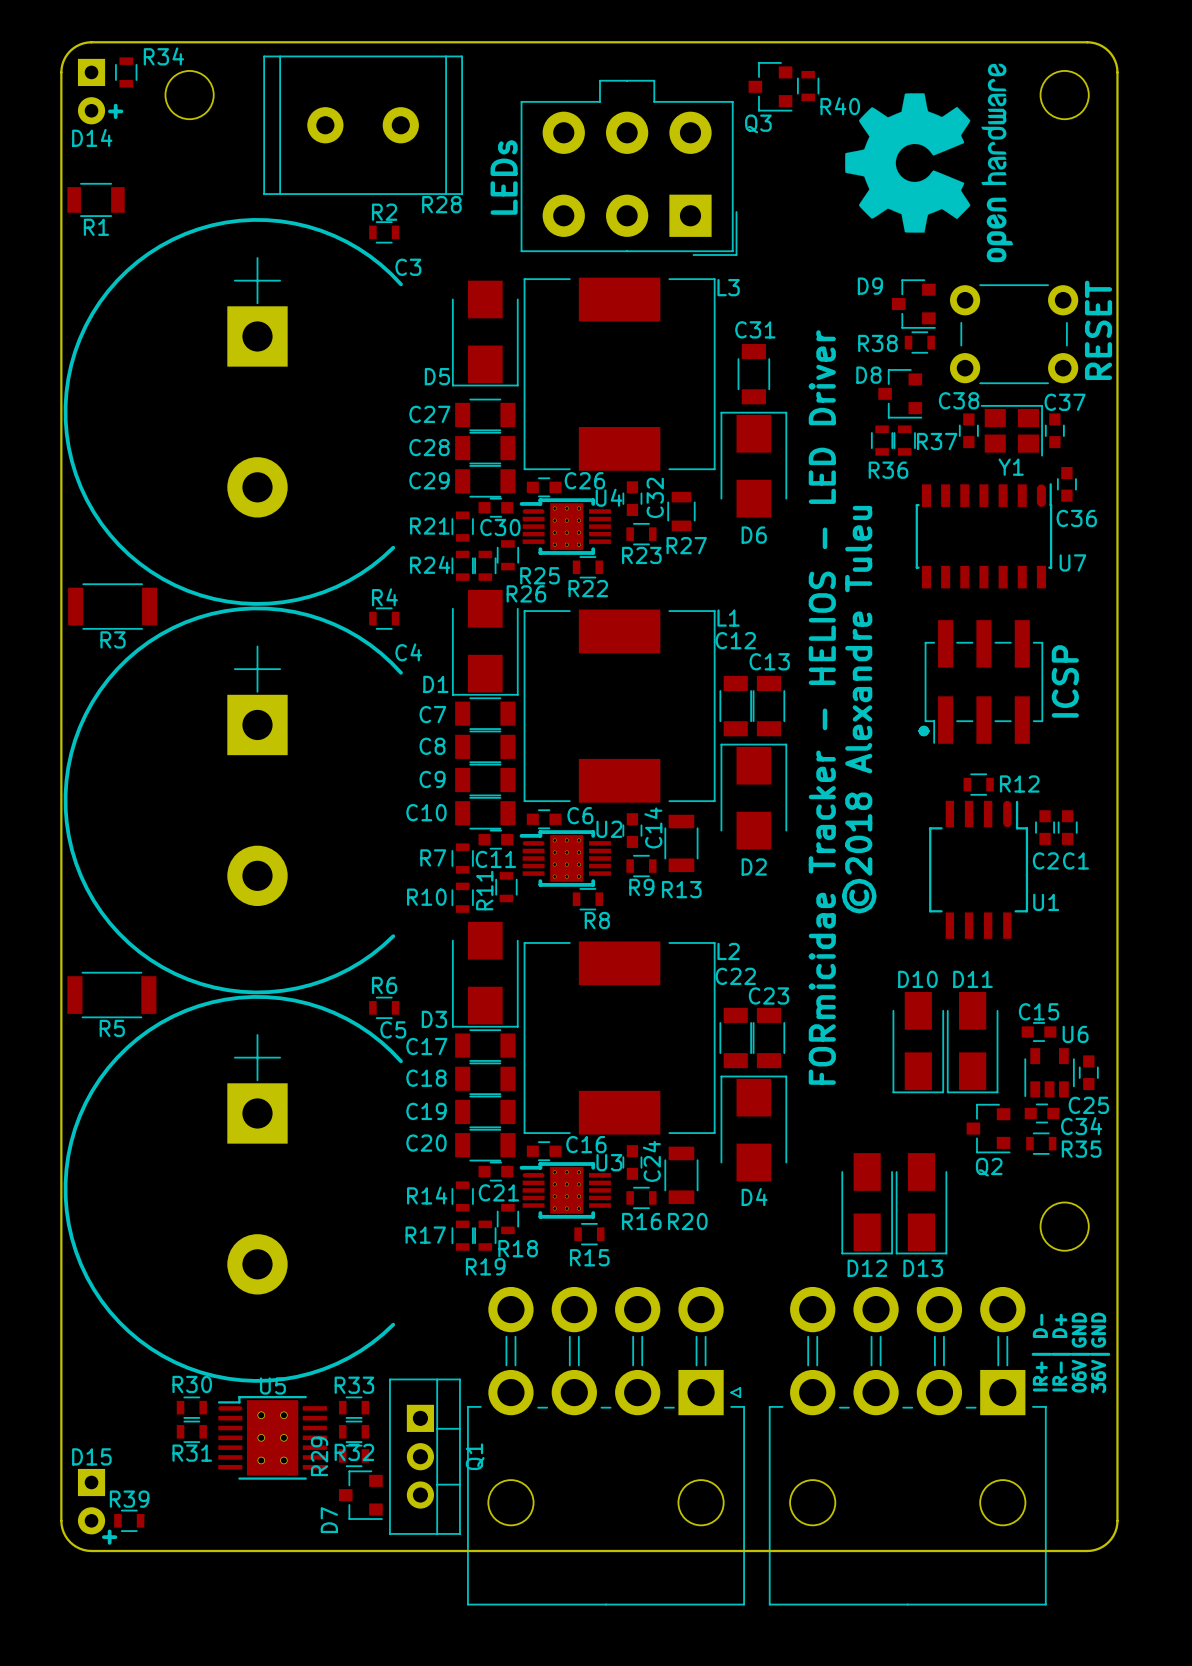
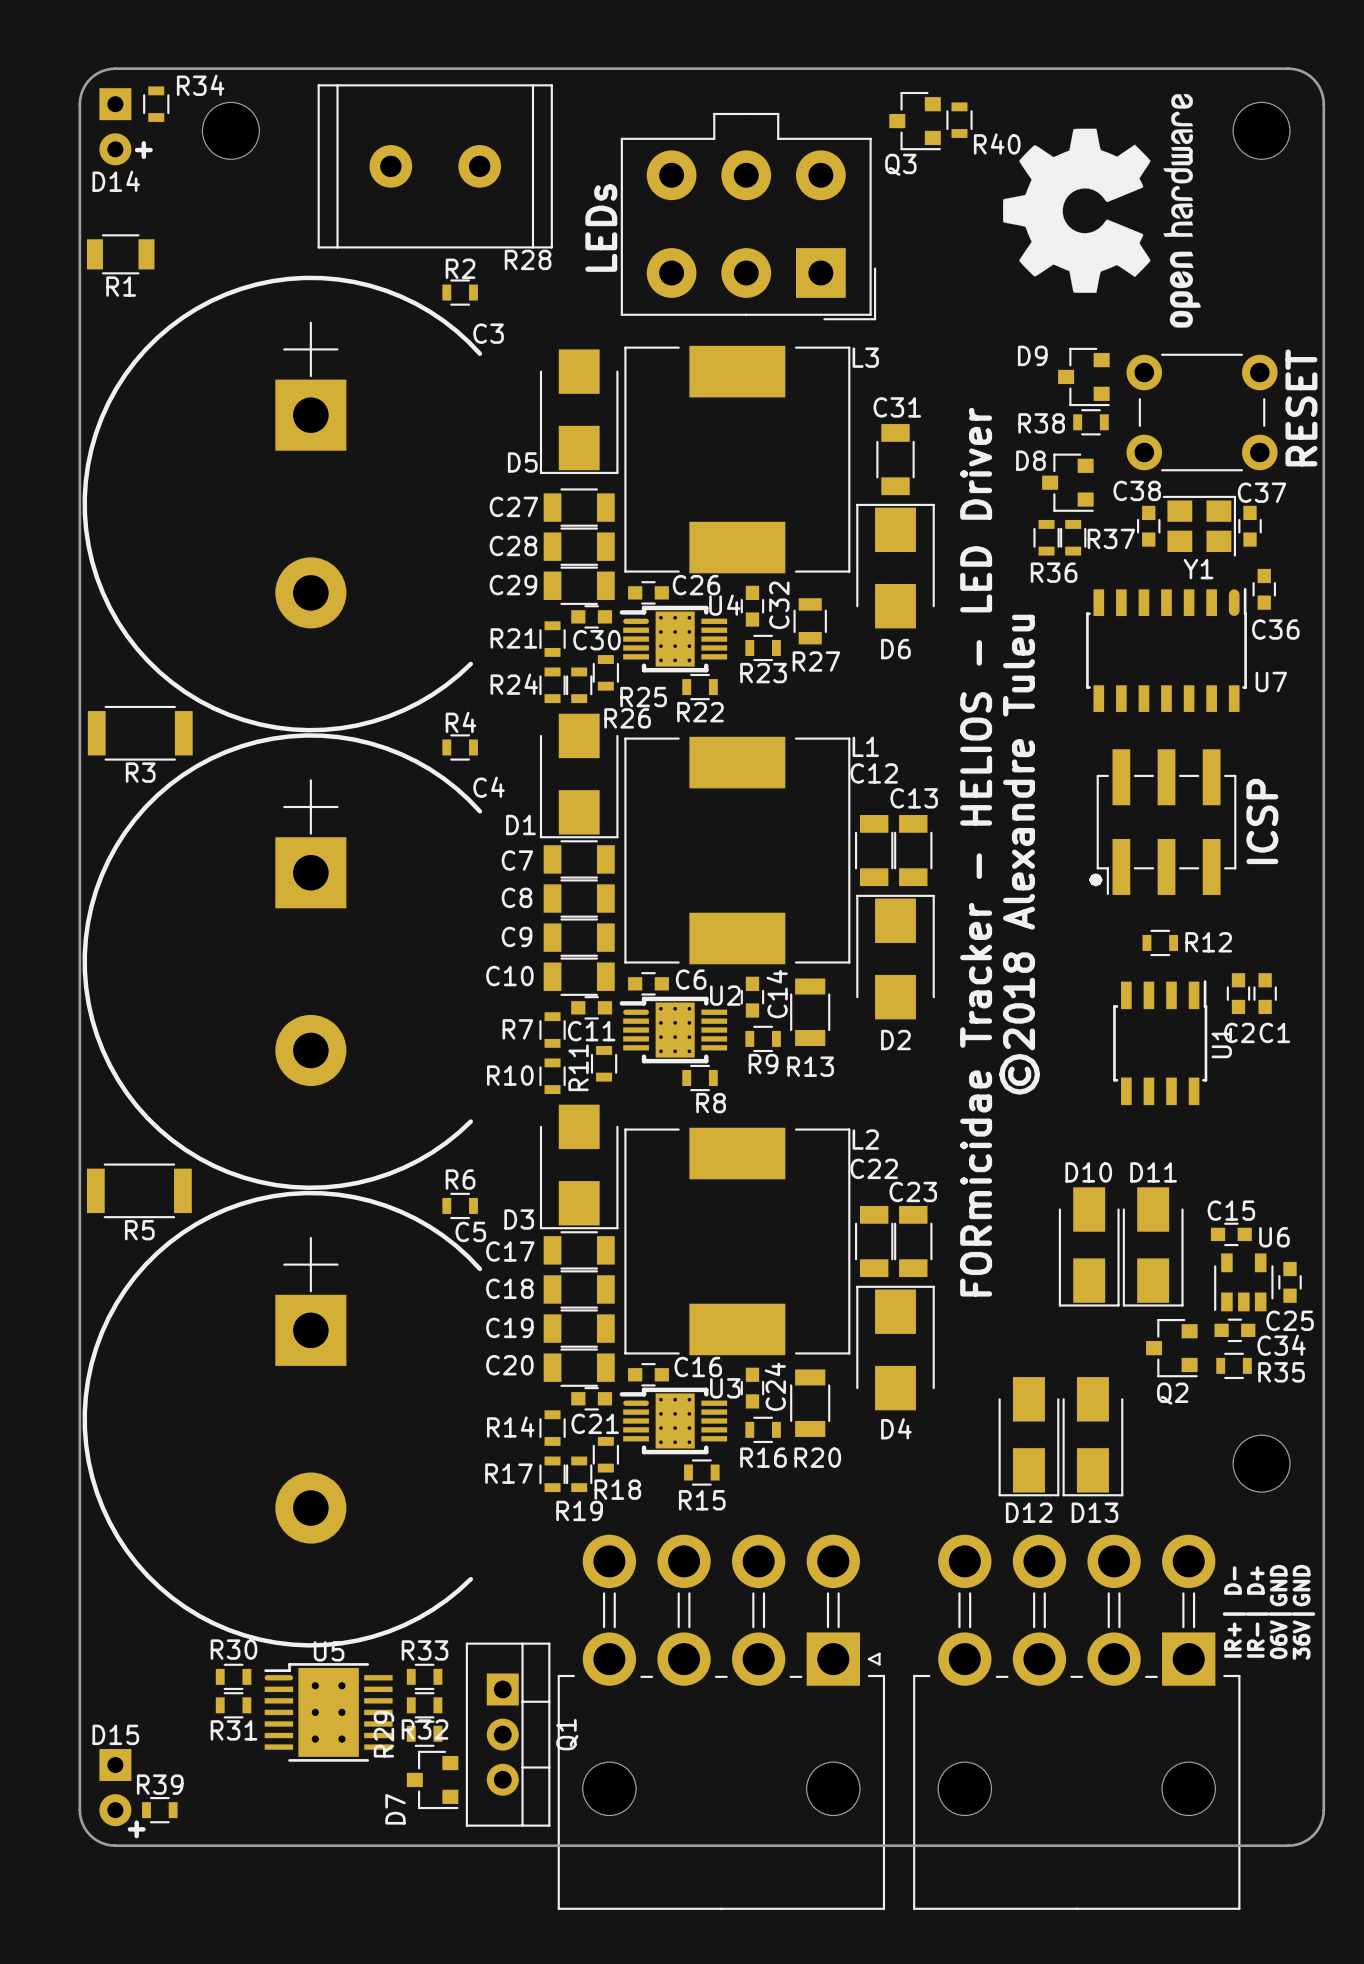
U1 footprint: [929, 800, 1029, 939] -> [1113, 980, 1208, 1106]
U1 name position: U1 (1046, 902) -> U1 (1221, 1042)

